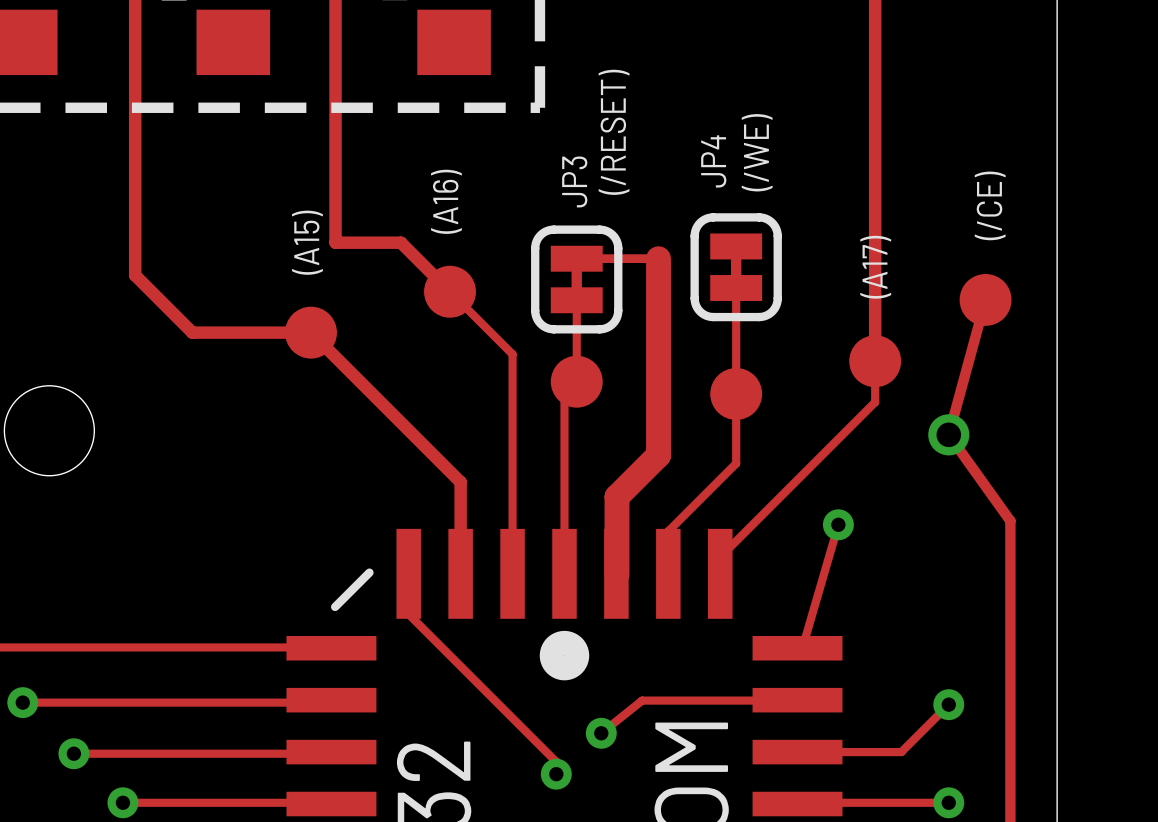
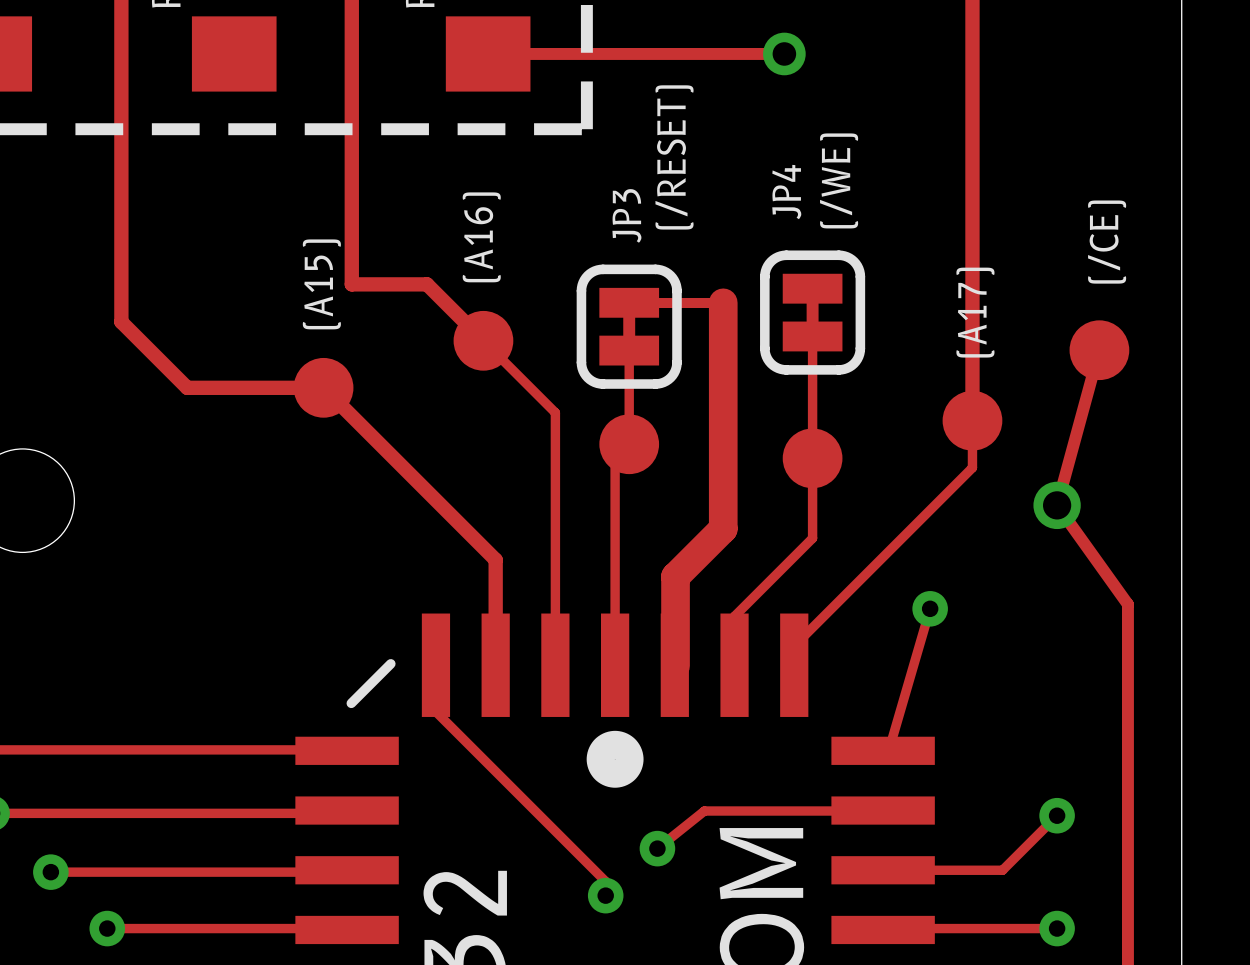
track: none -> (488, 53) (784, 53)
via: none -> (784, 53)

